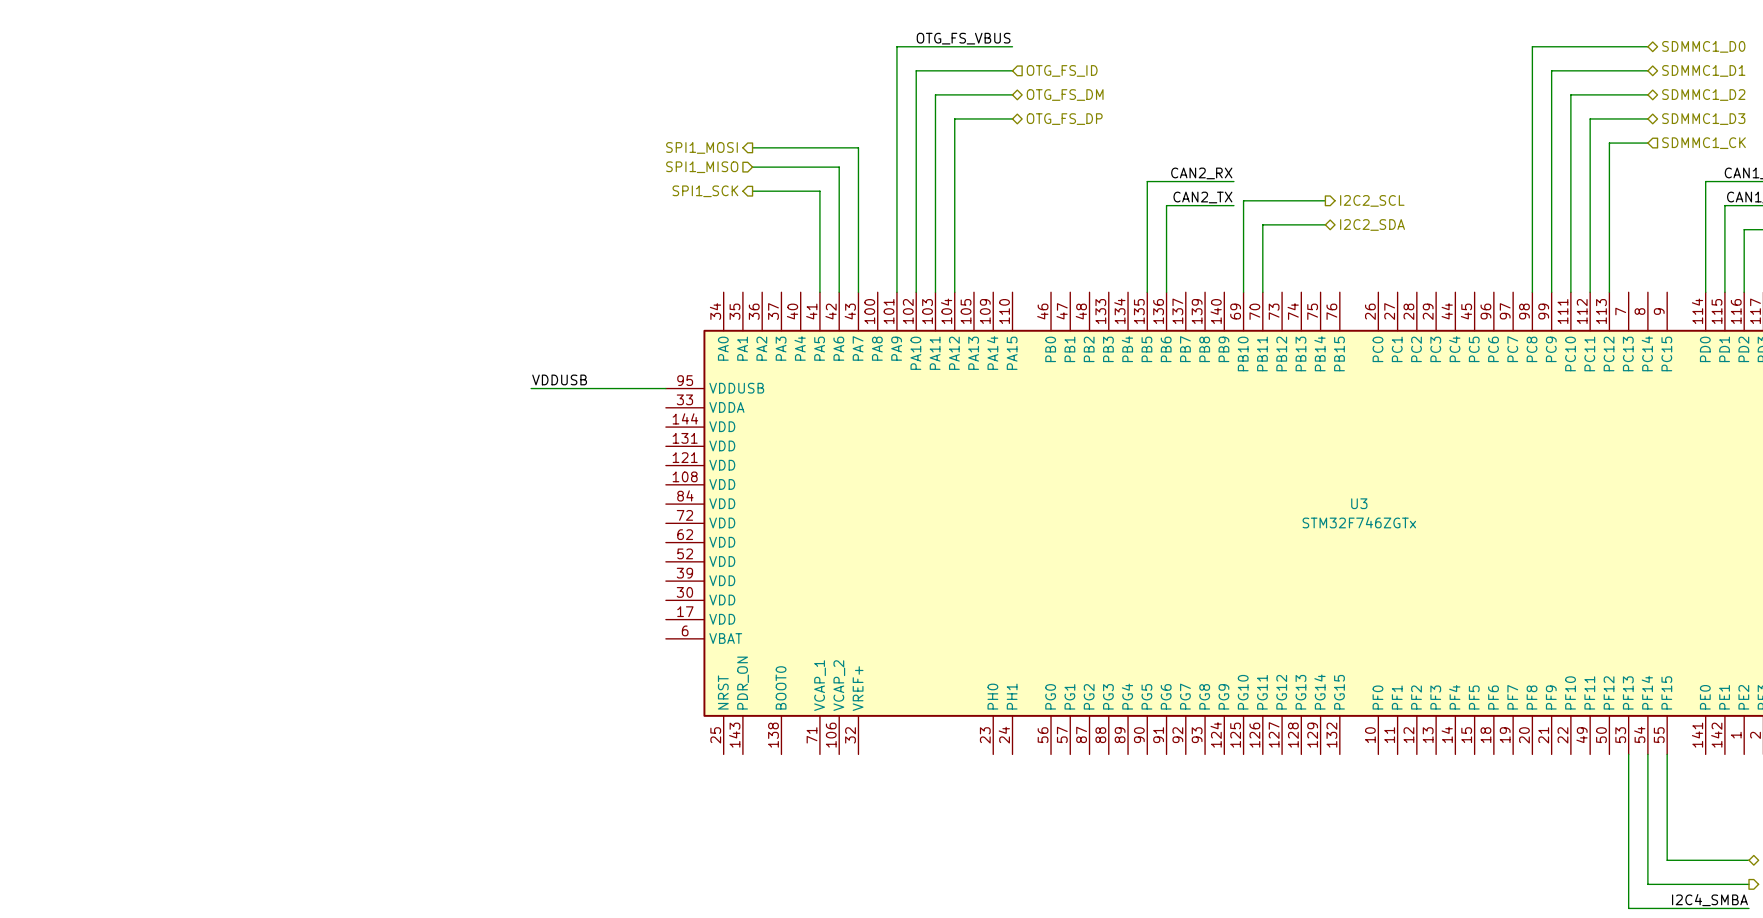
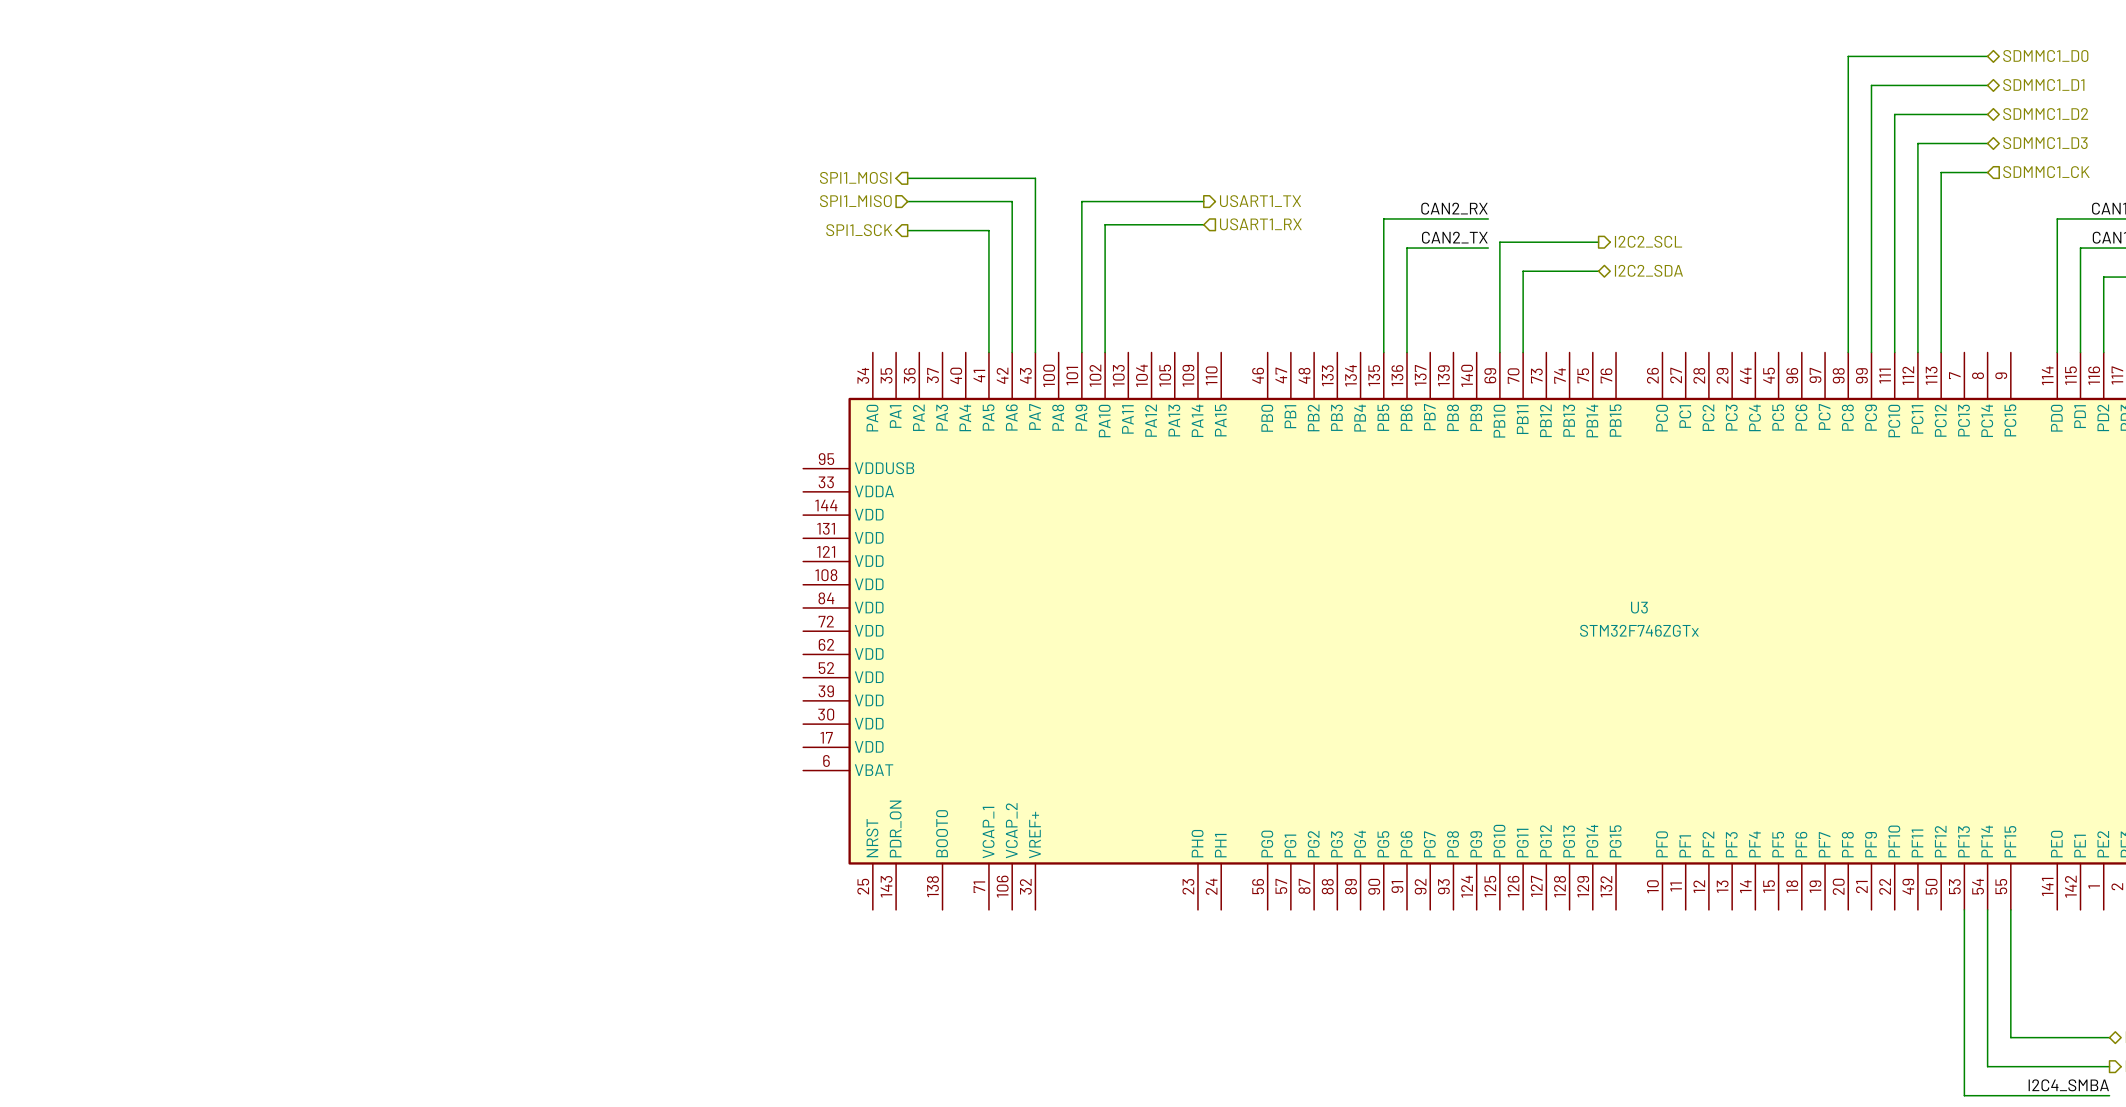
label: OTG_FS_VBUS (963, 38) -> none
wire: (1012, 46) (896, 46) (896, 167) -> (1203, 201) (1081, 201)
wire: (1012, 70) (916, 70) (916, 186) -> (1203, 224) (1105, 224)
hierarchical label: OTG_FS_ID (1062, 70) -> none
wire: (1012, 94) (935, 94) (935, 292) -> none
hierarchical label: OTG_FS_DM (1065, 95) -> none
wire: (1012, 118) (954, 118) (954, 292) -> none
hierarchical label: OTG_FS_DP (1064, 119) -> none
hierarchical label: none -> USART1_TX (1260, 201)
hierarchical label: none -> USART1_RX (1260, 224)
label: VDDUSB (559, 379) -> none
wire: (531, 388) (665, 388) -> none

